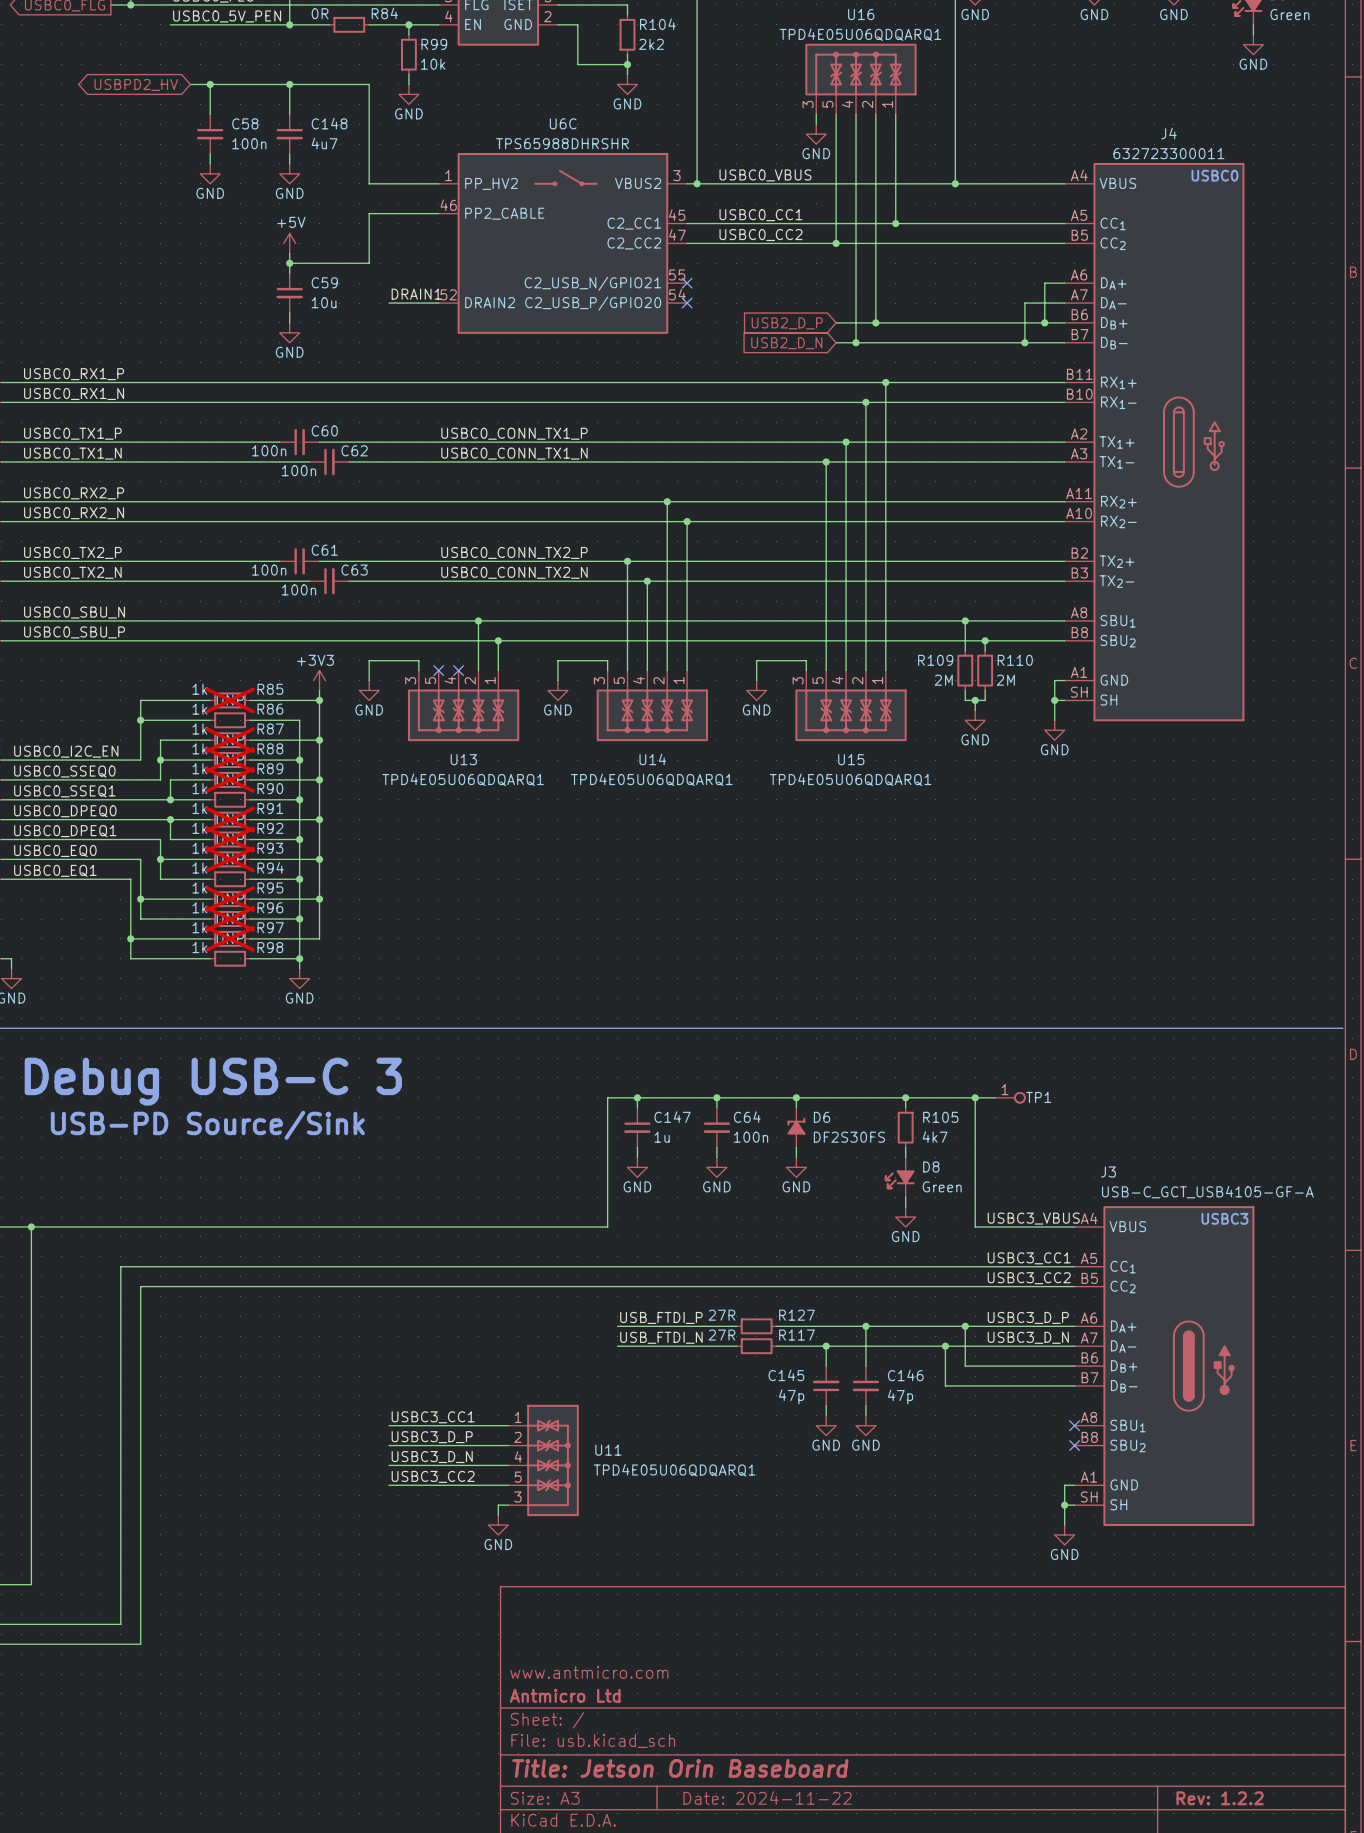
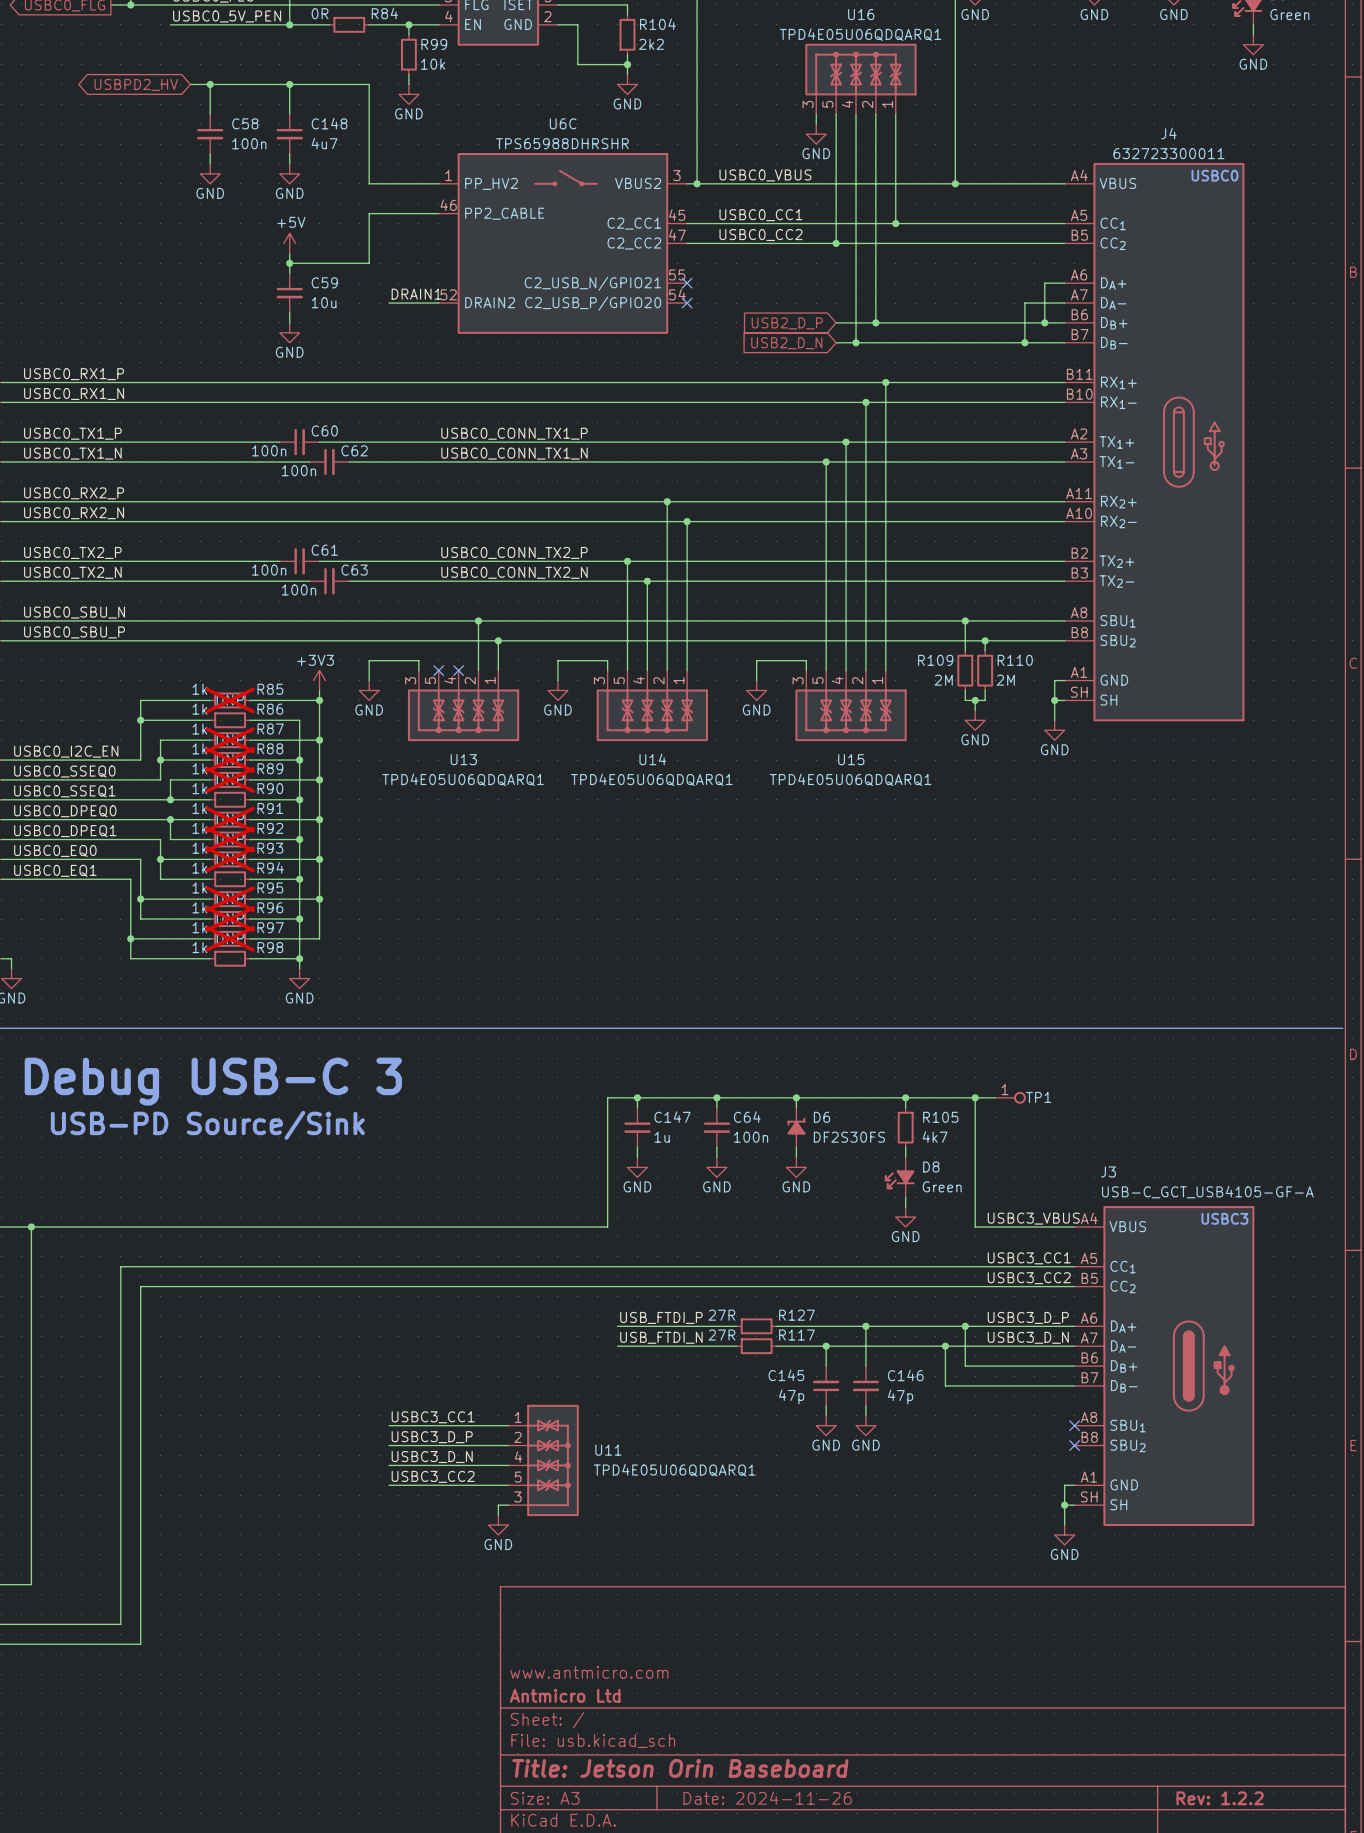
title block: Date: 2024-11-22 (767, 1798) -> Date: 2024-11-26 (767, 1798)

